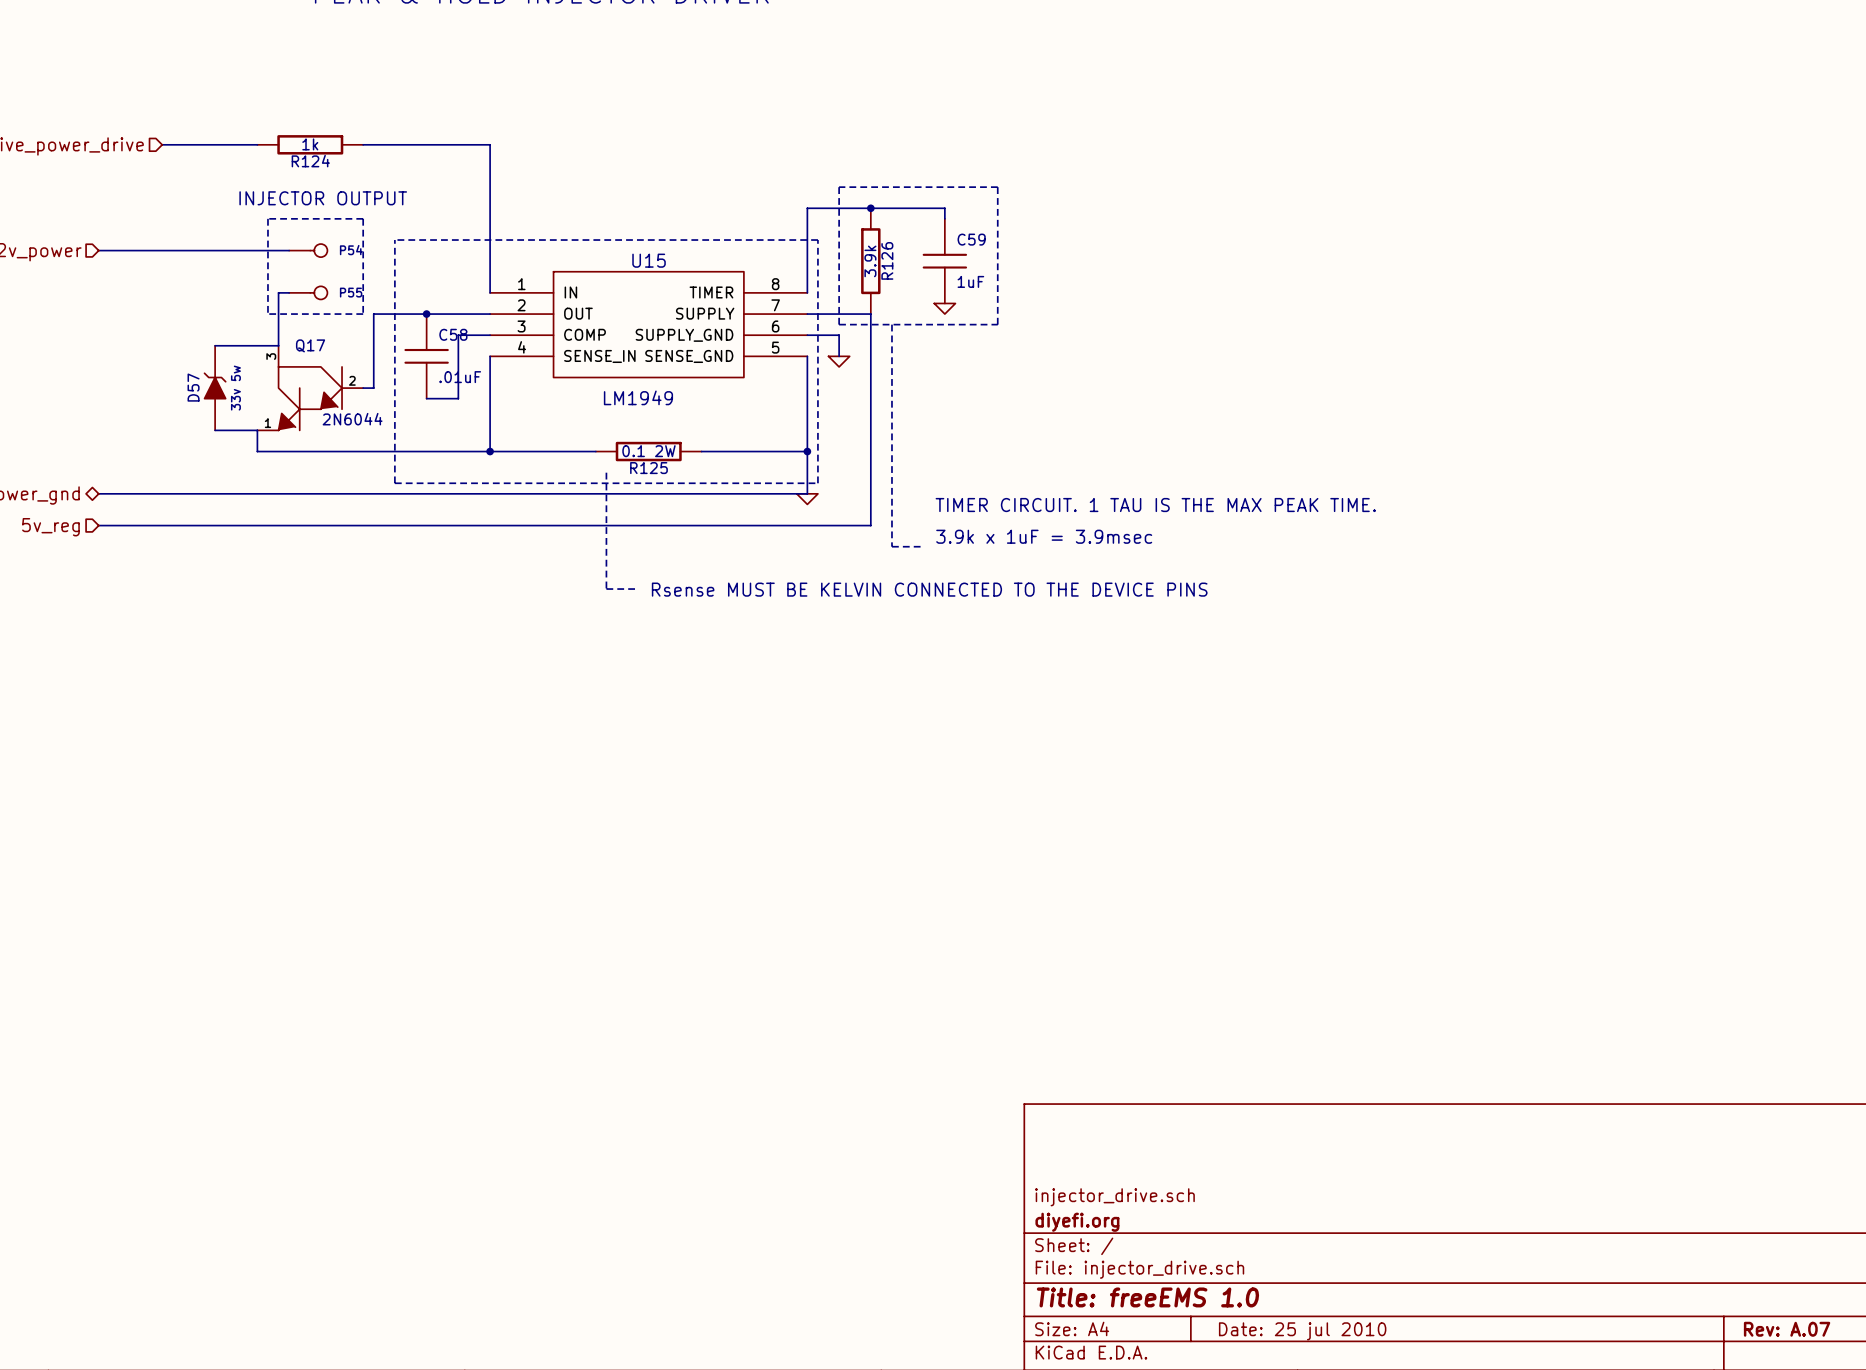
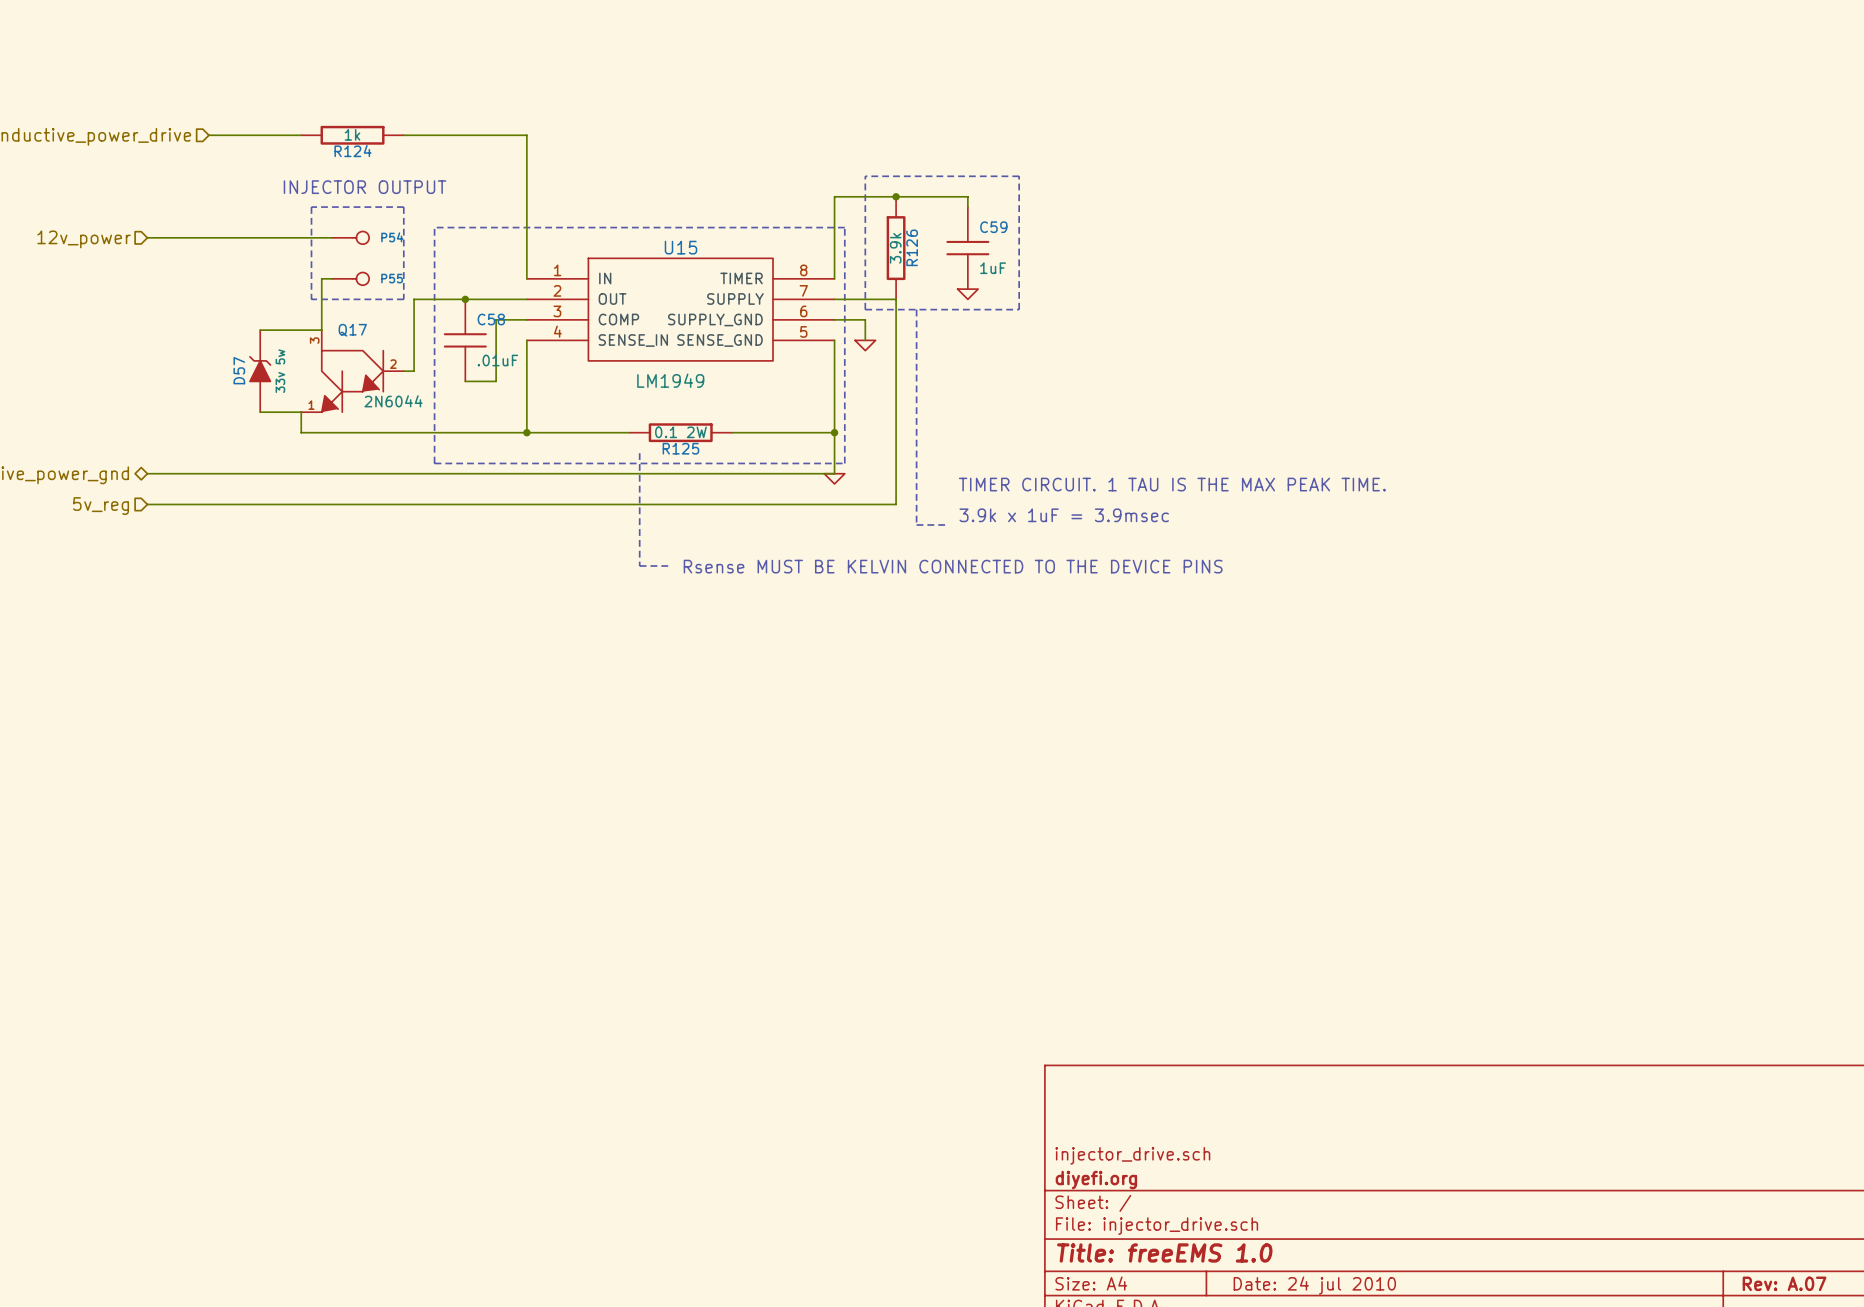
title block: Date: 25 jul 2010 (1302, 1331) -> Date: 24 jul 2010 (1314, 1285)

